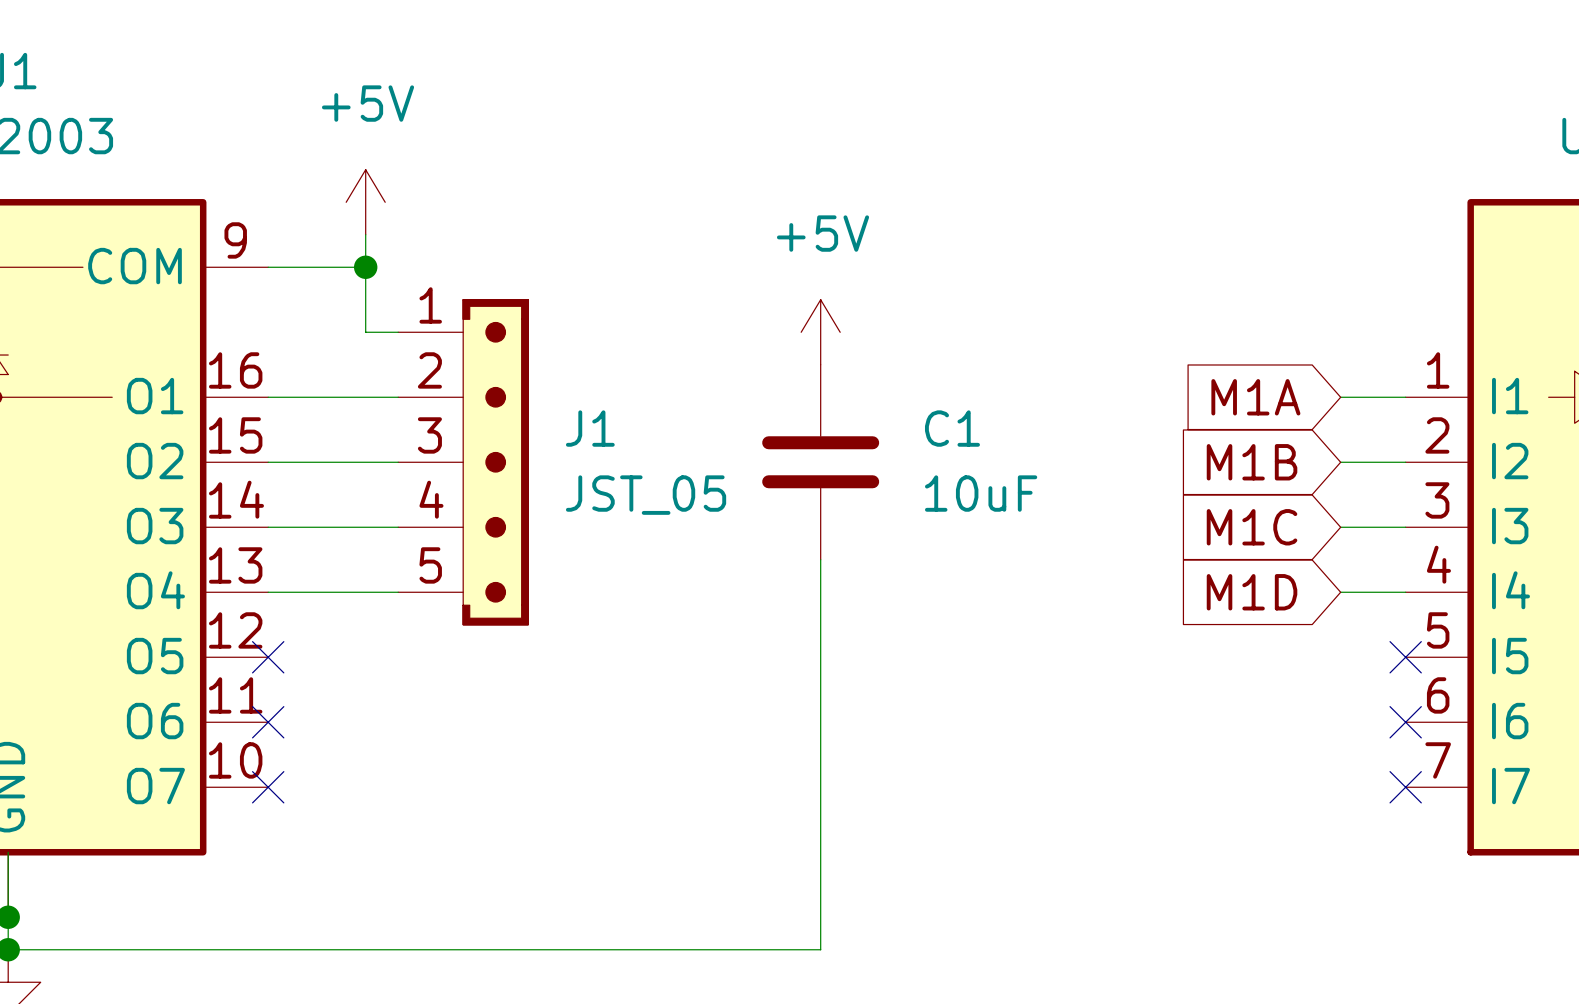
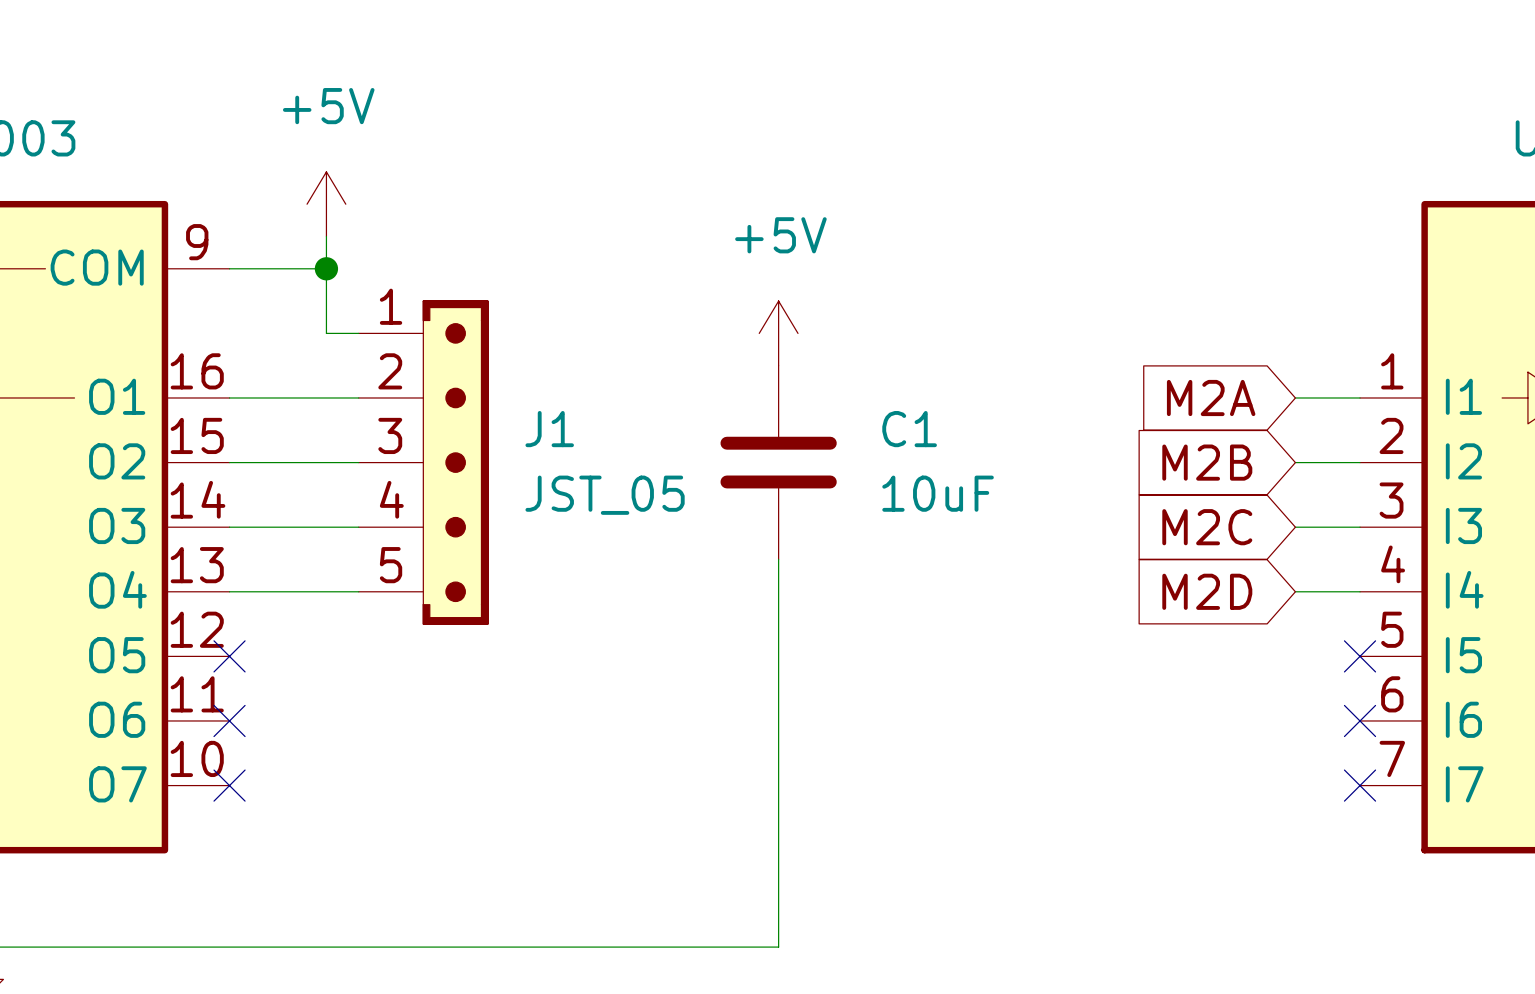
global label: M1A (1255, 397) -> M2A (1211, 397)
global label: M1B (1252, 462) -> M2B (1207, 462)
global label: M1C (1252, 527) -> M2C (1207, 527)
global label: M1D (1252, 592) -> M2D (1207, 591)

